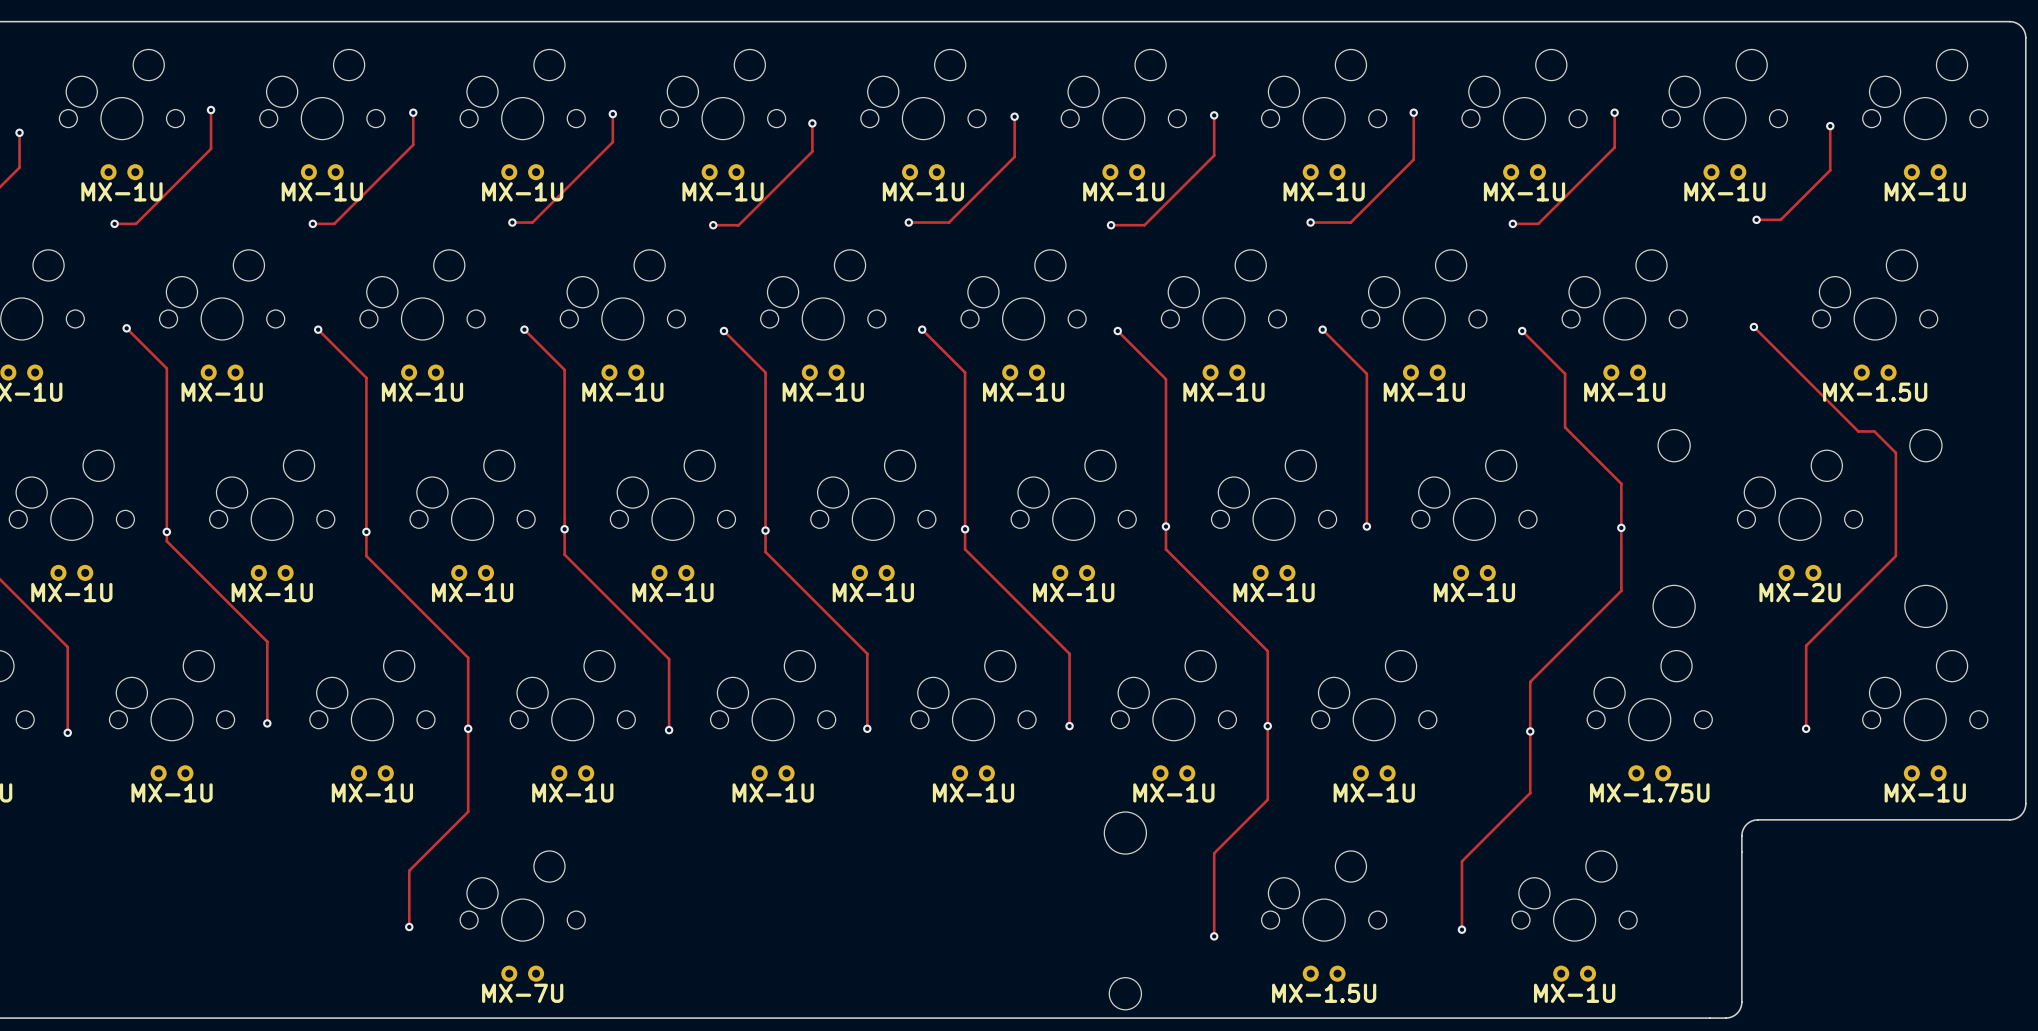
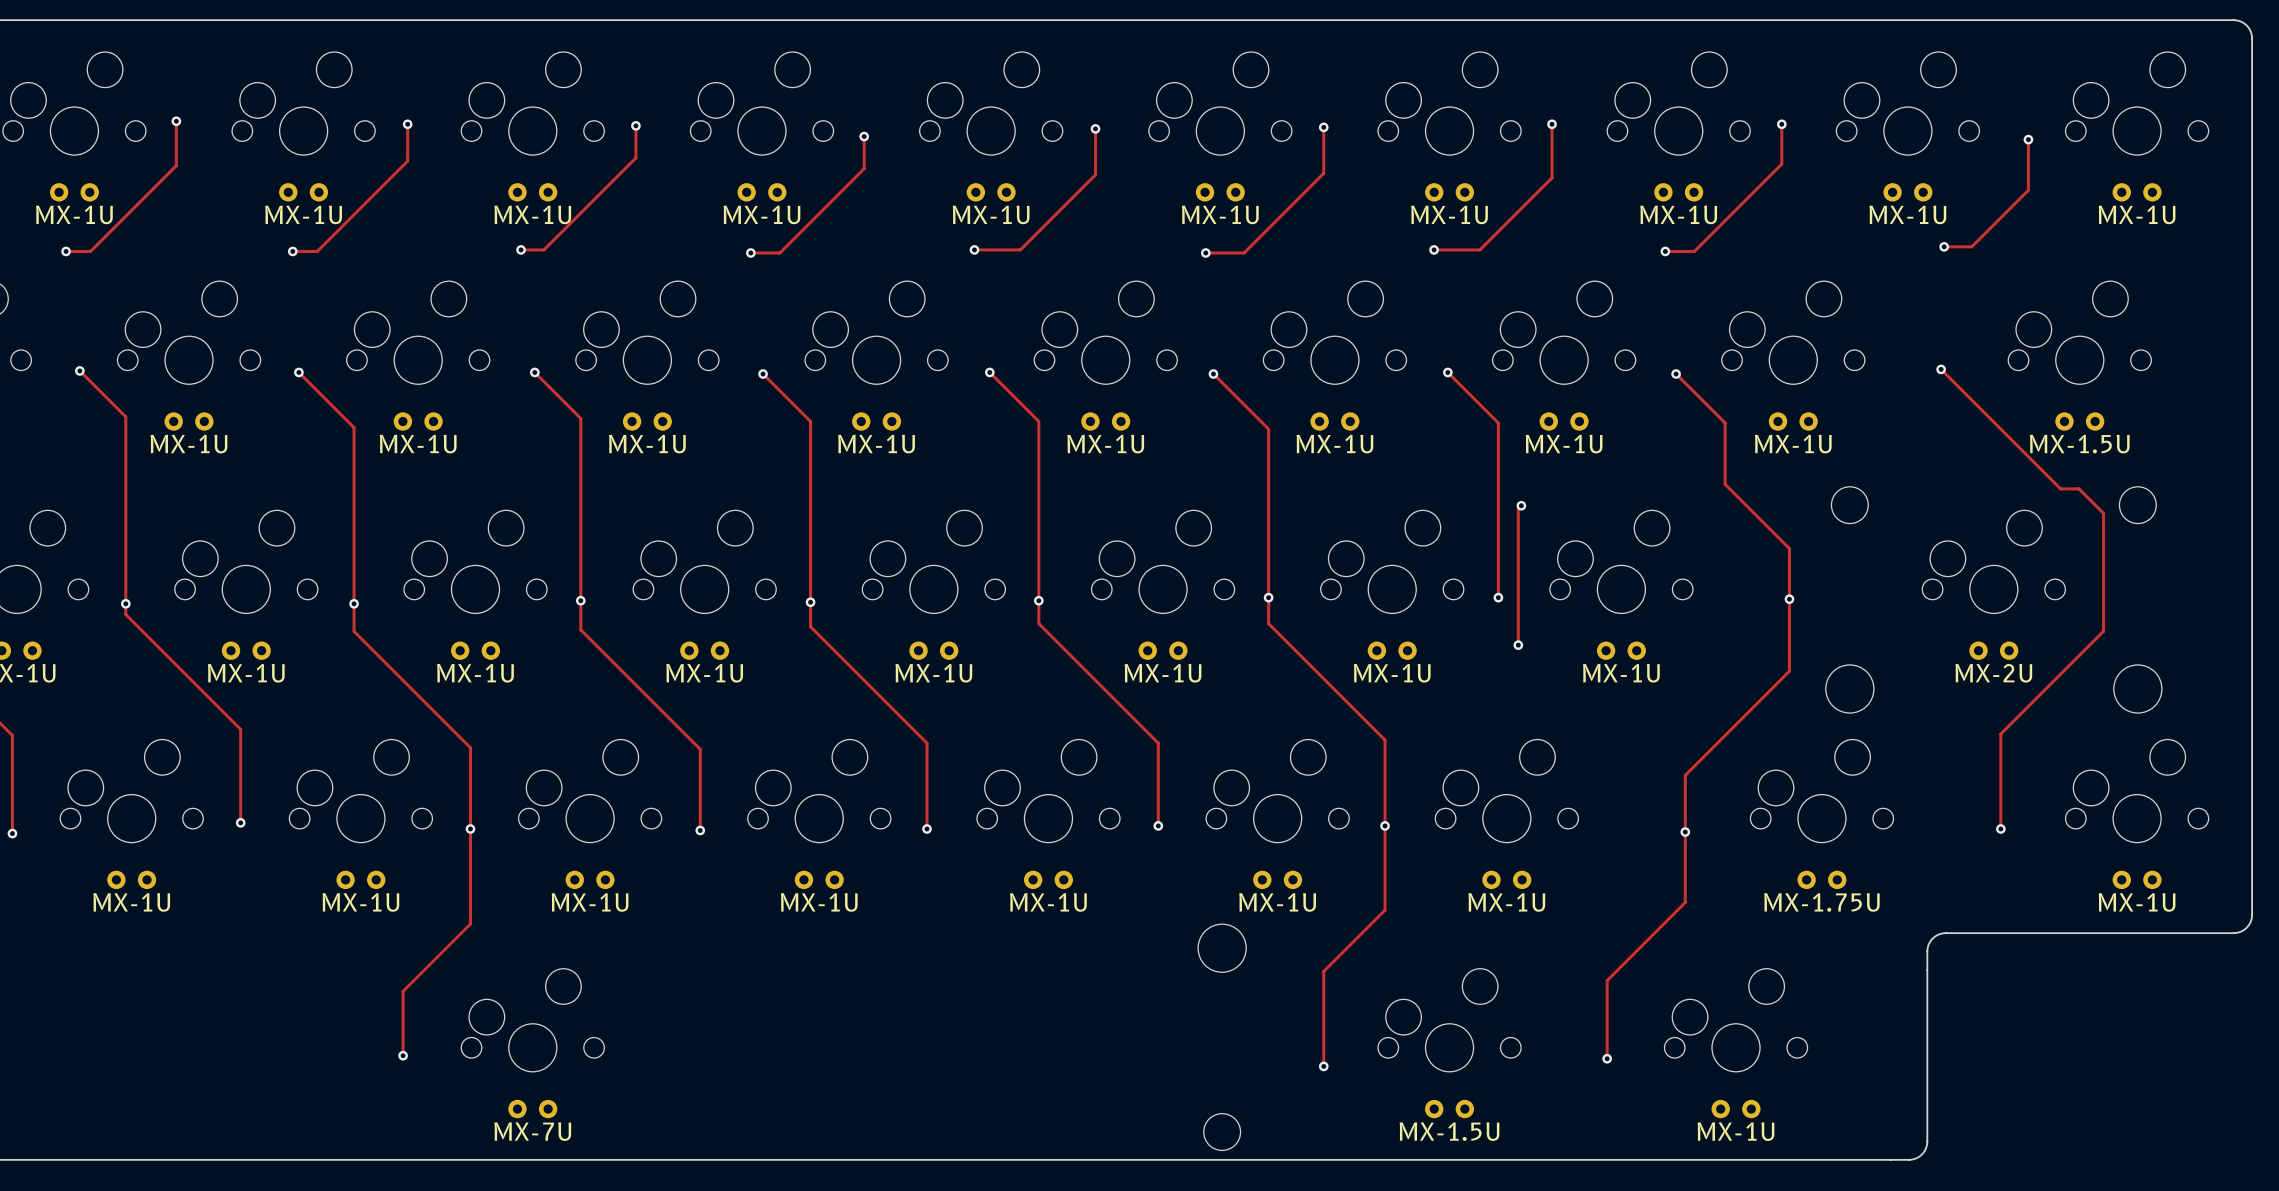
track: none -> (1521, 505) (1518, 508) (1518, 645)
via: none -> (1521, 505)
via: none -> (1518, 645)

